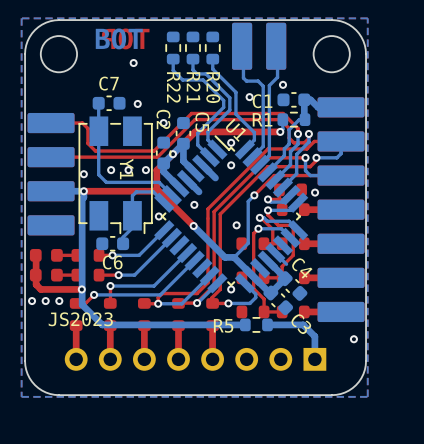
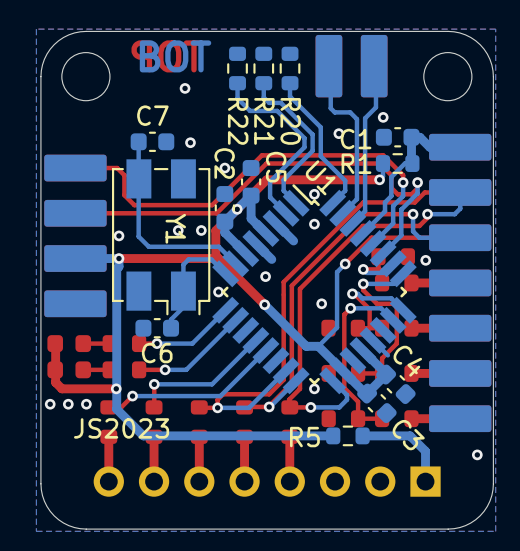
via: (111, 170) -> none

